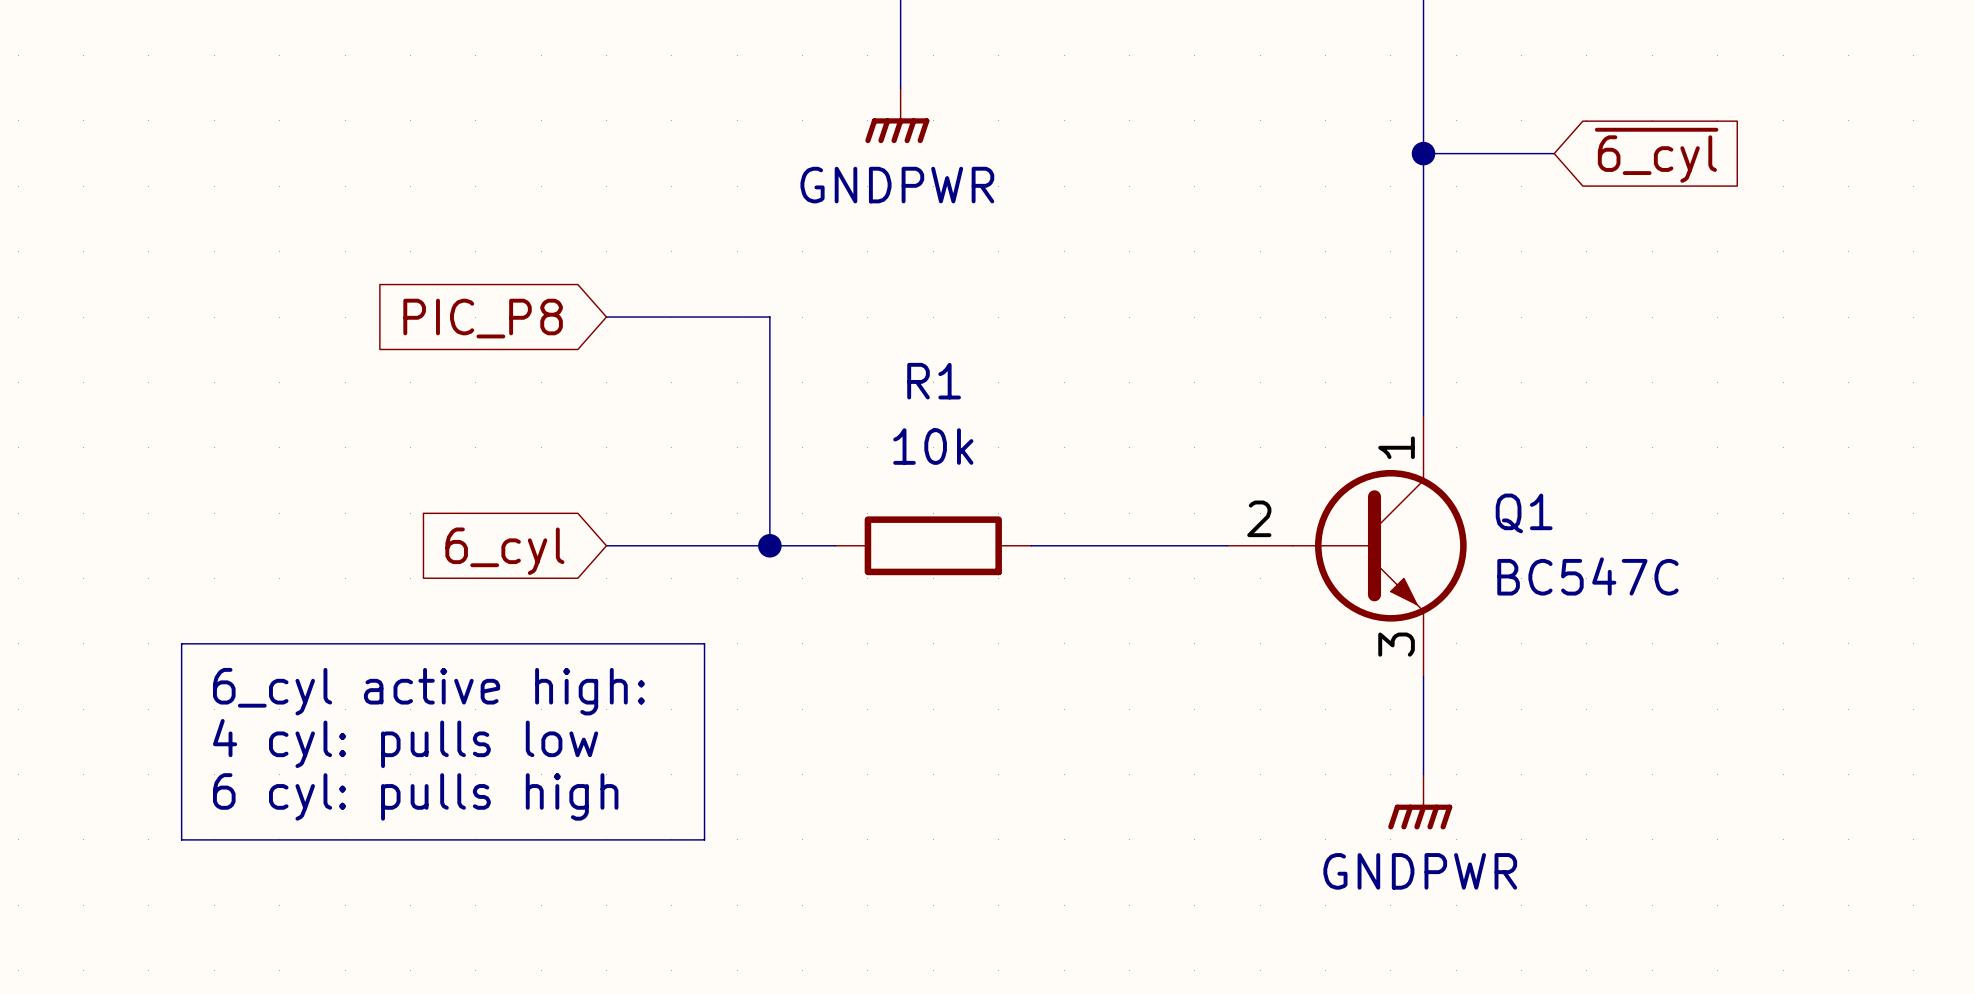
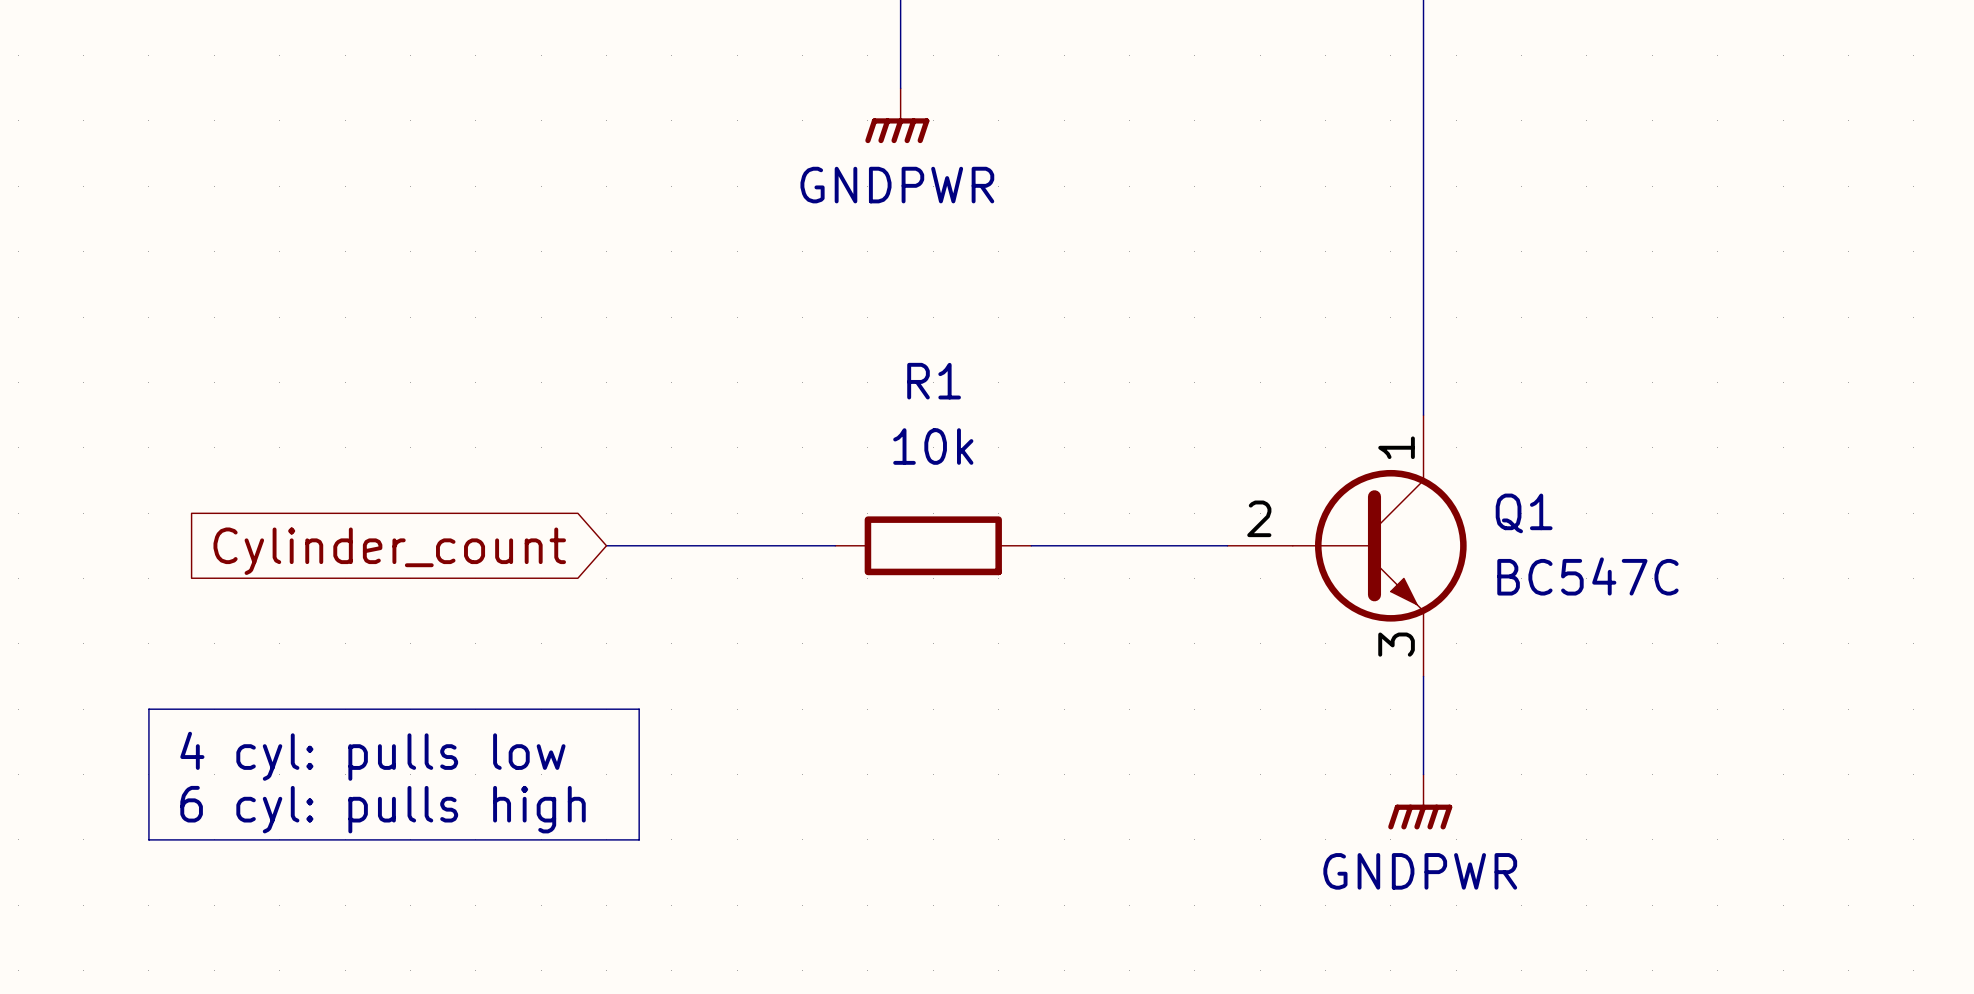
wire: (1423, 153) (1554, 153) -> none
junction: (1423, 153) -> none
global label: ~{6_cyl} (1656, 155) -> none
wire: (606, 317) (769, 317) (769, 545) -> none
global label: PIC_P8 (483, 318) -> none
junction: (769, 545) -> none
global label: 6_cyl (504, 551) -> Cylinder_count (389, 551)
text: 6_cyl active high: (428, 691) -> none
text position: 4 cyl: pulls low (405, 743) -> 4 cyl: pulls low (372, 756)
text position: 6 cyl: pulls high (415, 796) -> 6 cyl: pulls high (383, 809)
line: (181, 839) (181, 643) (704, 643) (704, 839) (639, 839) -> (181, 839) (148, 839) (148, 709) (639, 709) (639, 839)

